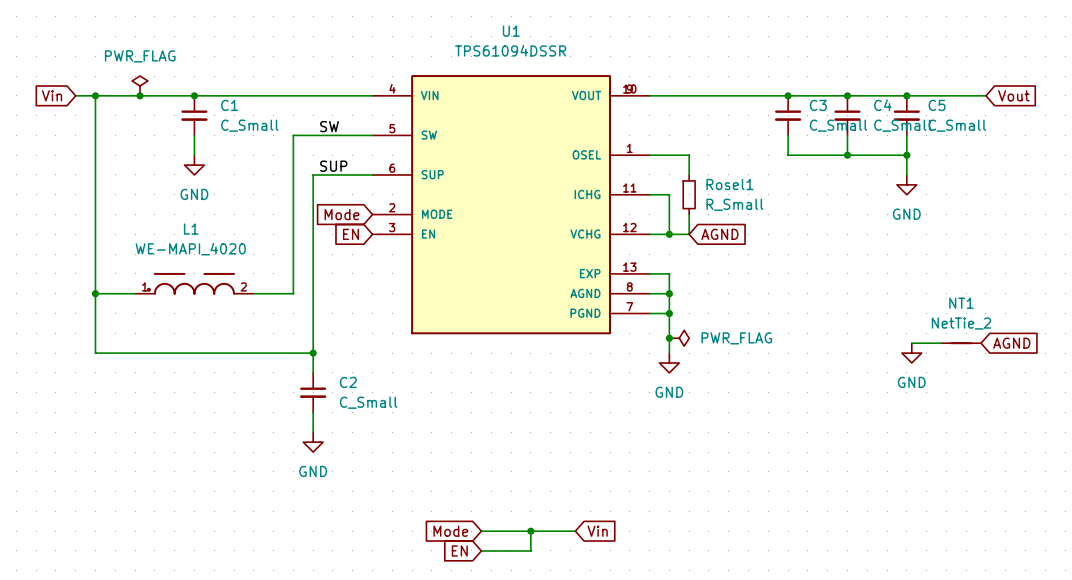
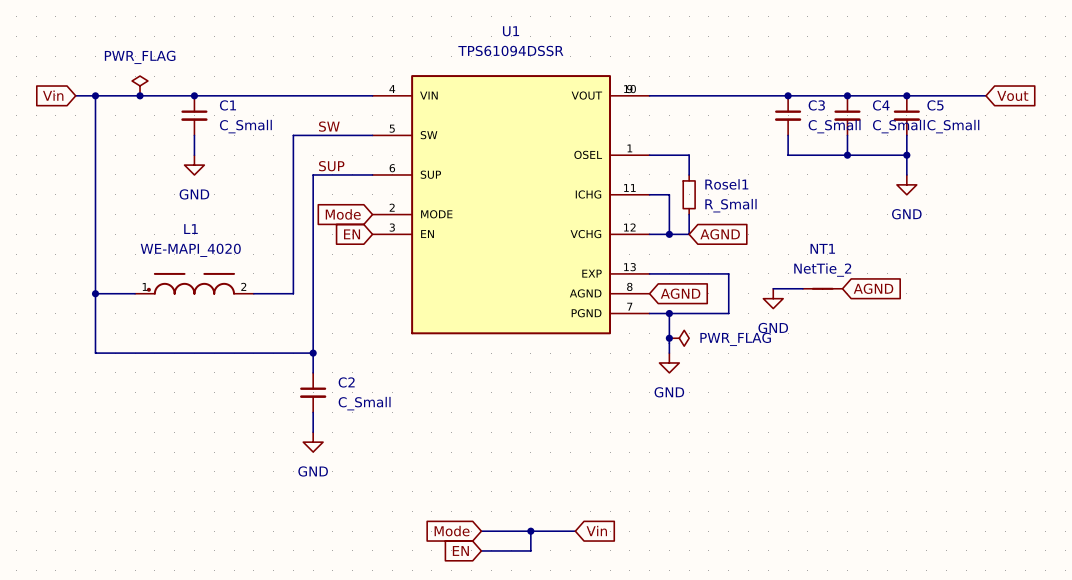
wire: (669, 273) (669, 313) -> (669, 273) (728, 273) (728, 313) (669, 313)
wire: (649, 293) (669, 293) -> none
junction: (669, 293) -> none
global label: none -> AGND (680, 293)
wire: (911, 343) (941, 343) -> (773, 288) (802, 288)
NT1 position: (961, 343) -> (822, 288)
global label position: AGND (1011, 343) -> AGND (873, 288)
power symbol position: GND (911, 353) -> GND (773, 298)

